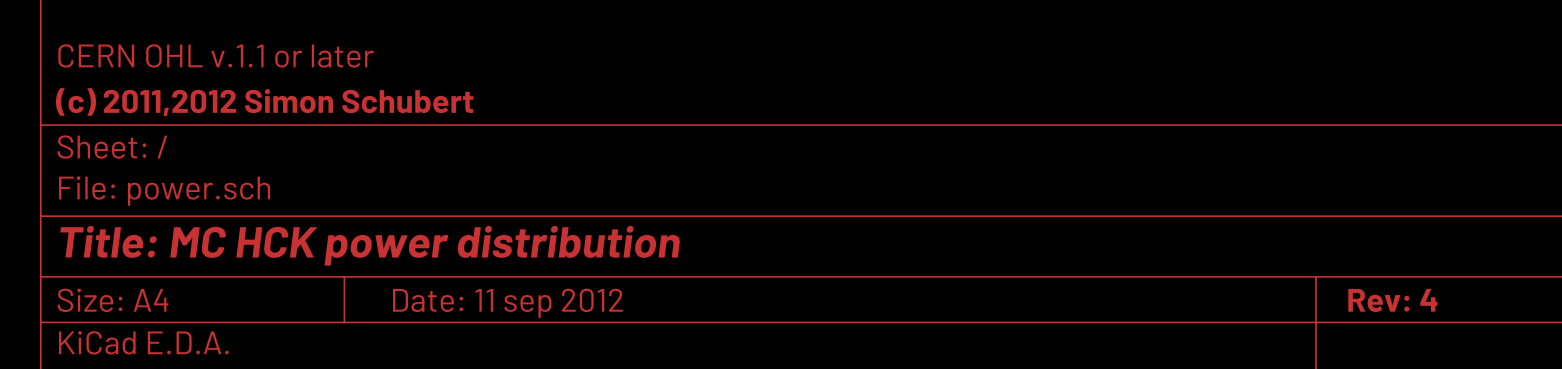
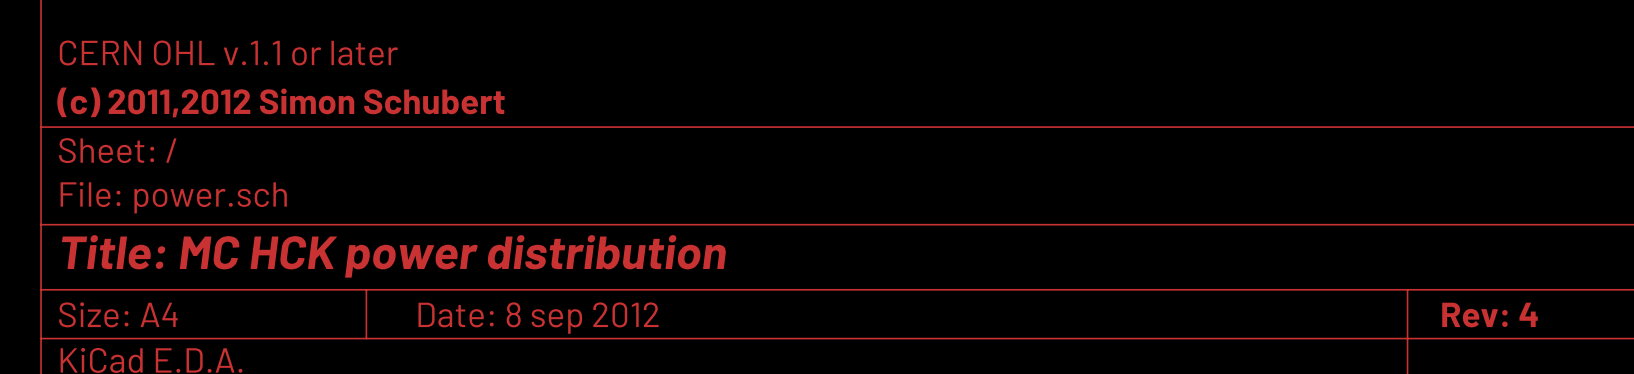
title block: Date: 11 sep 2012 (507, 303) -> Date: 8 sep 2012 (538, 318)

